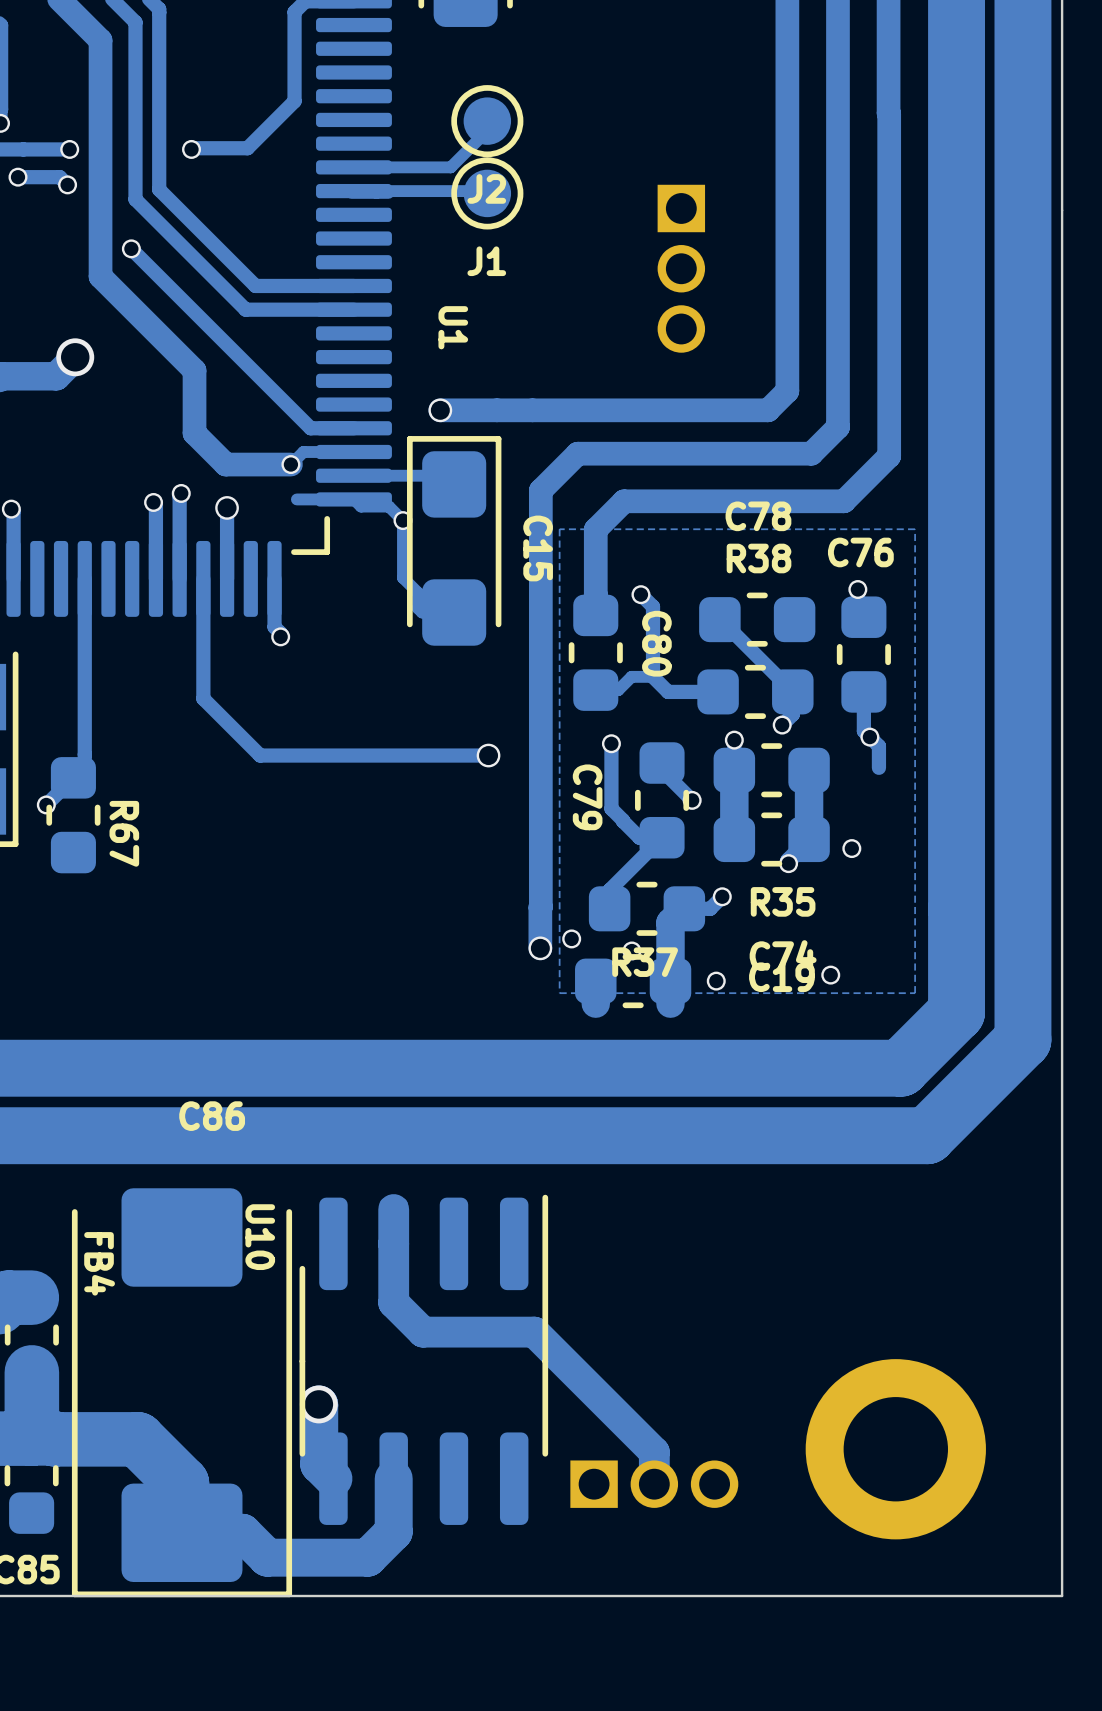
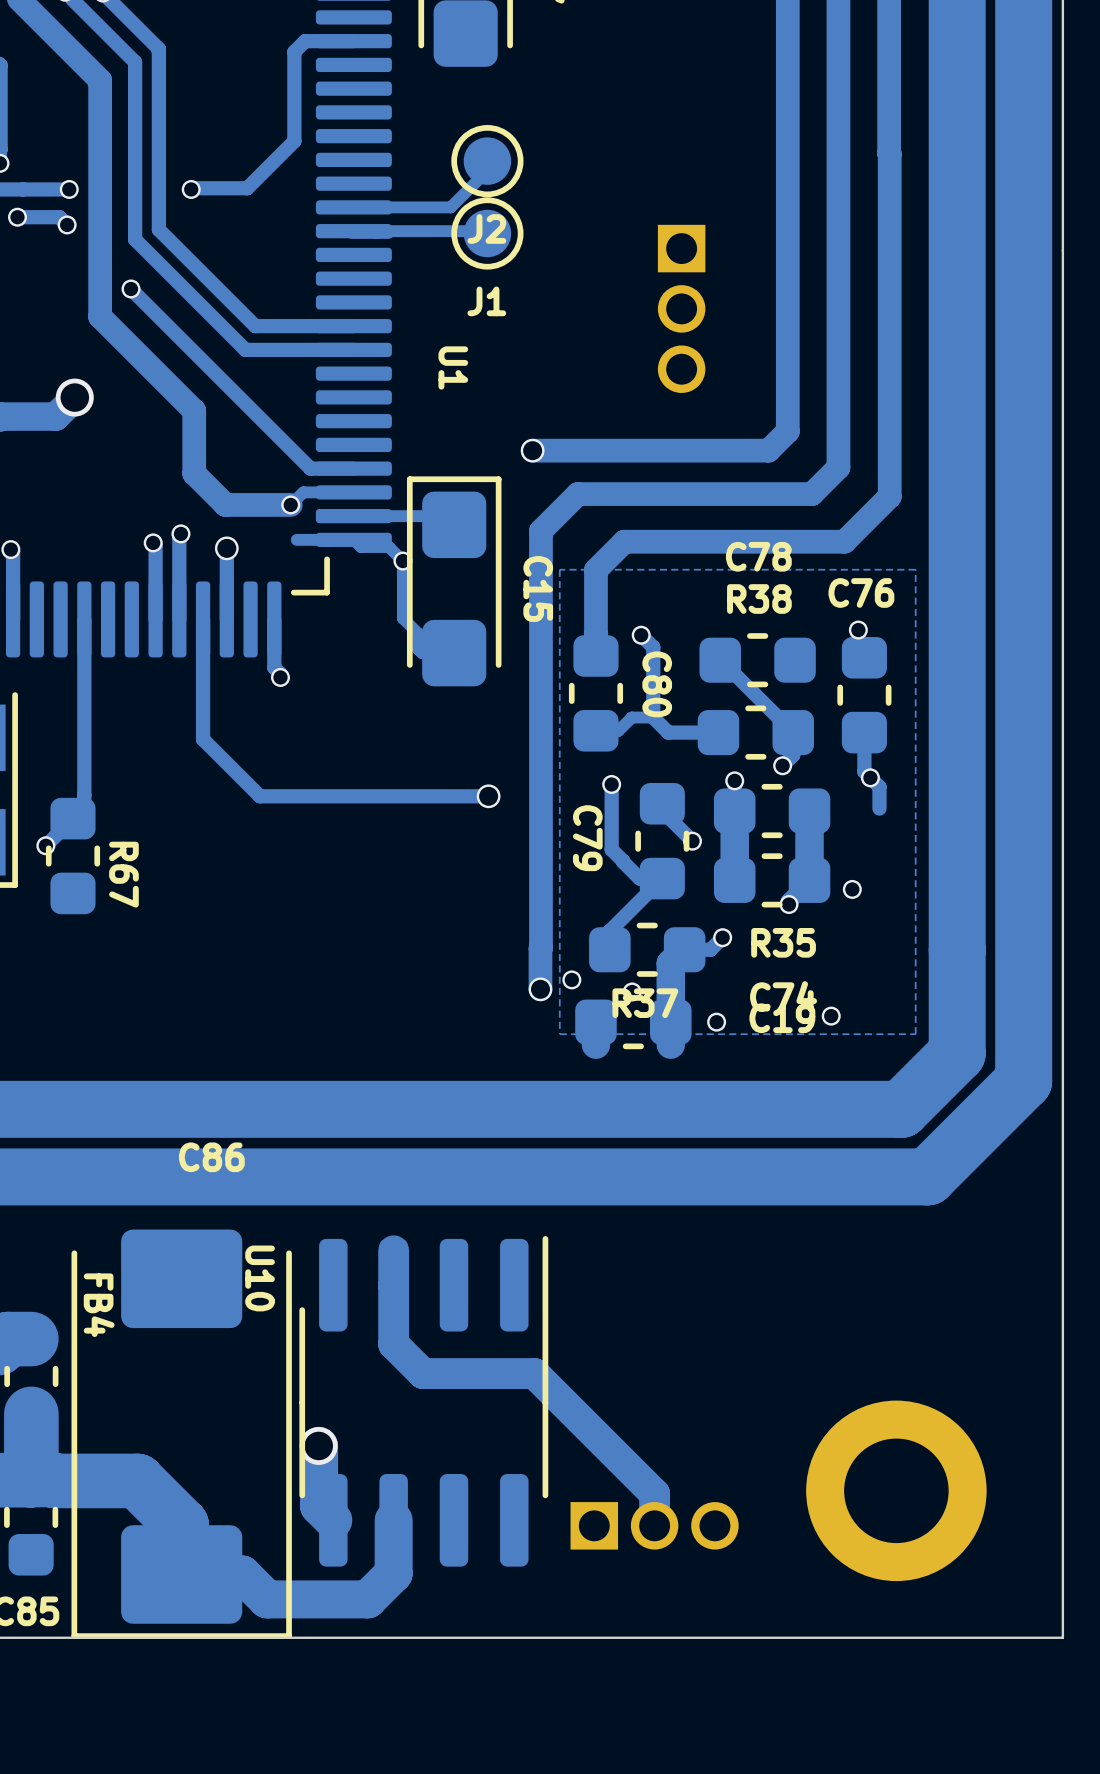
via position: (440, 410) -> (532, 450)
track: (532, 410) (440, 410) -> none

